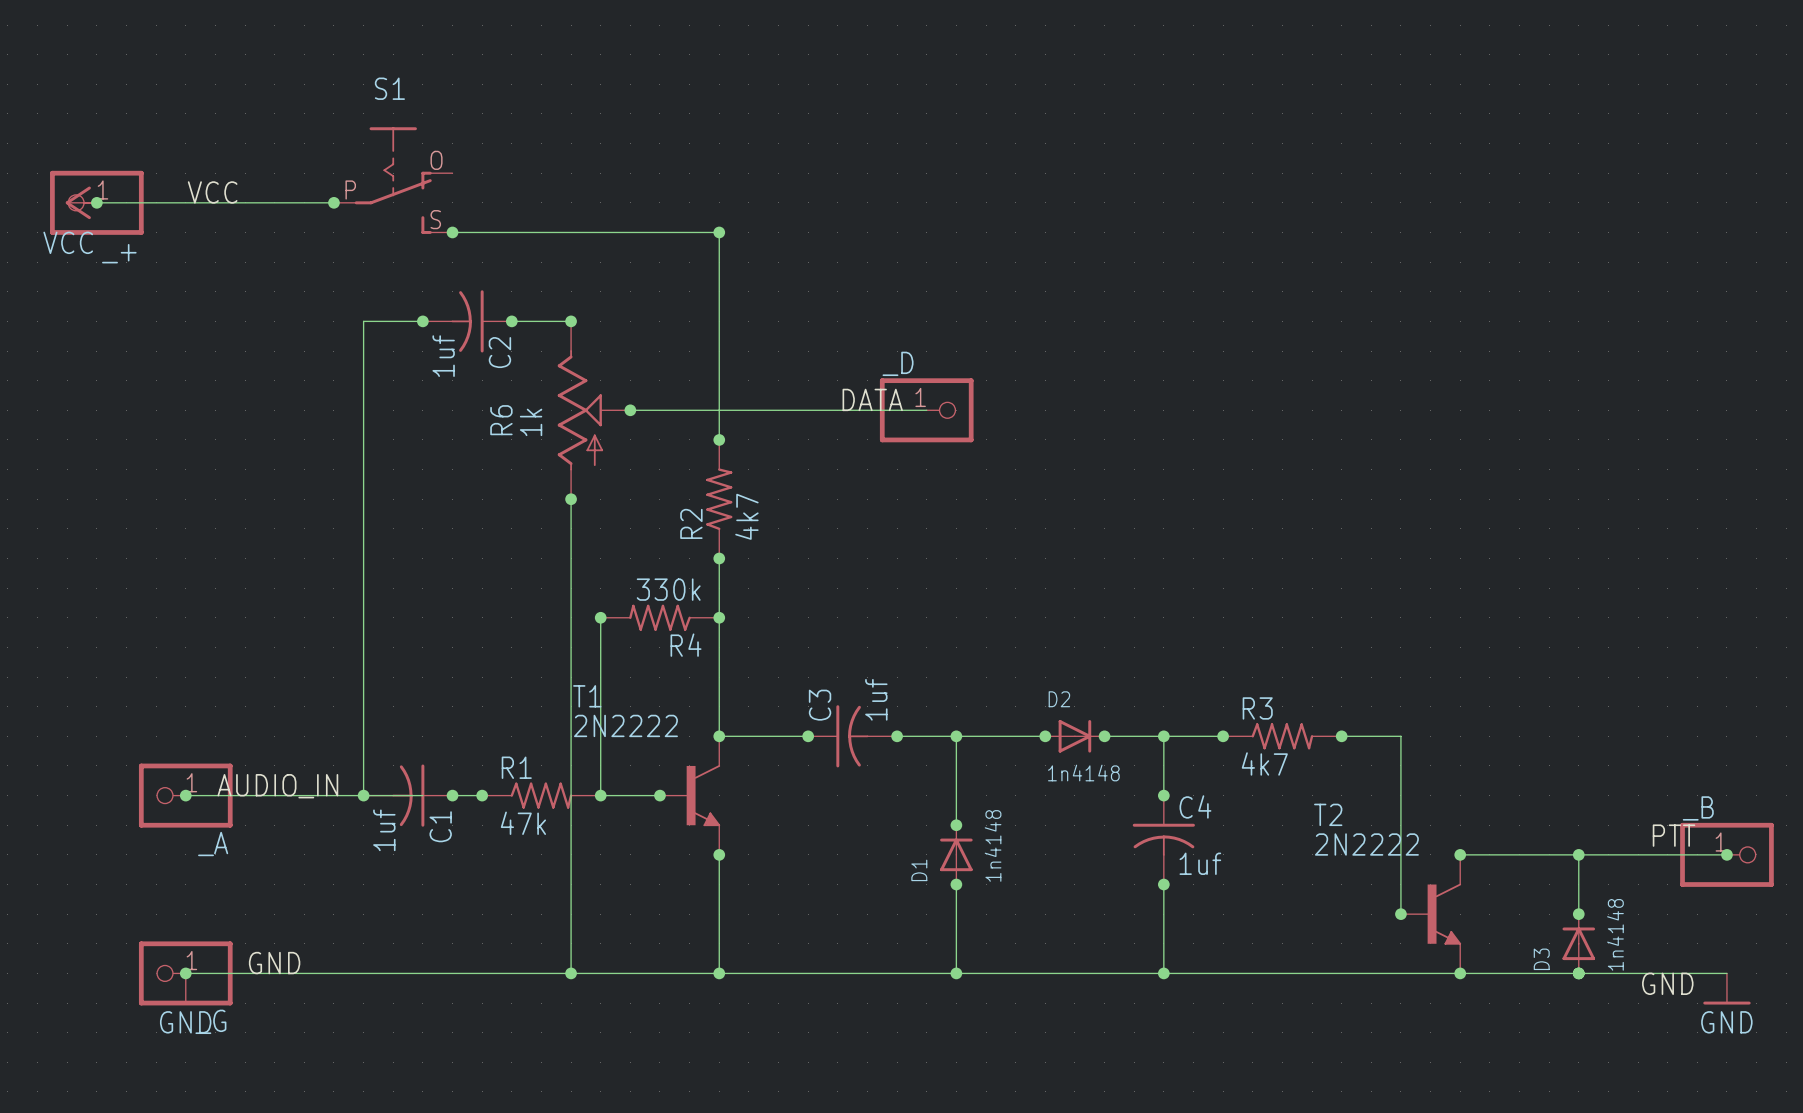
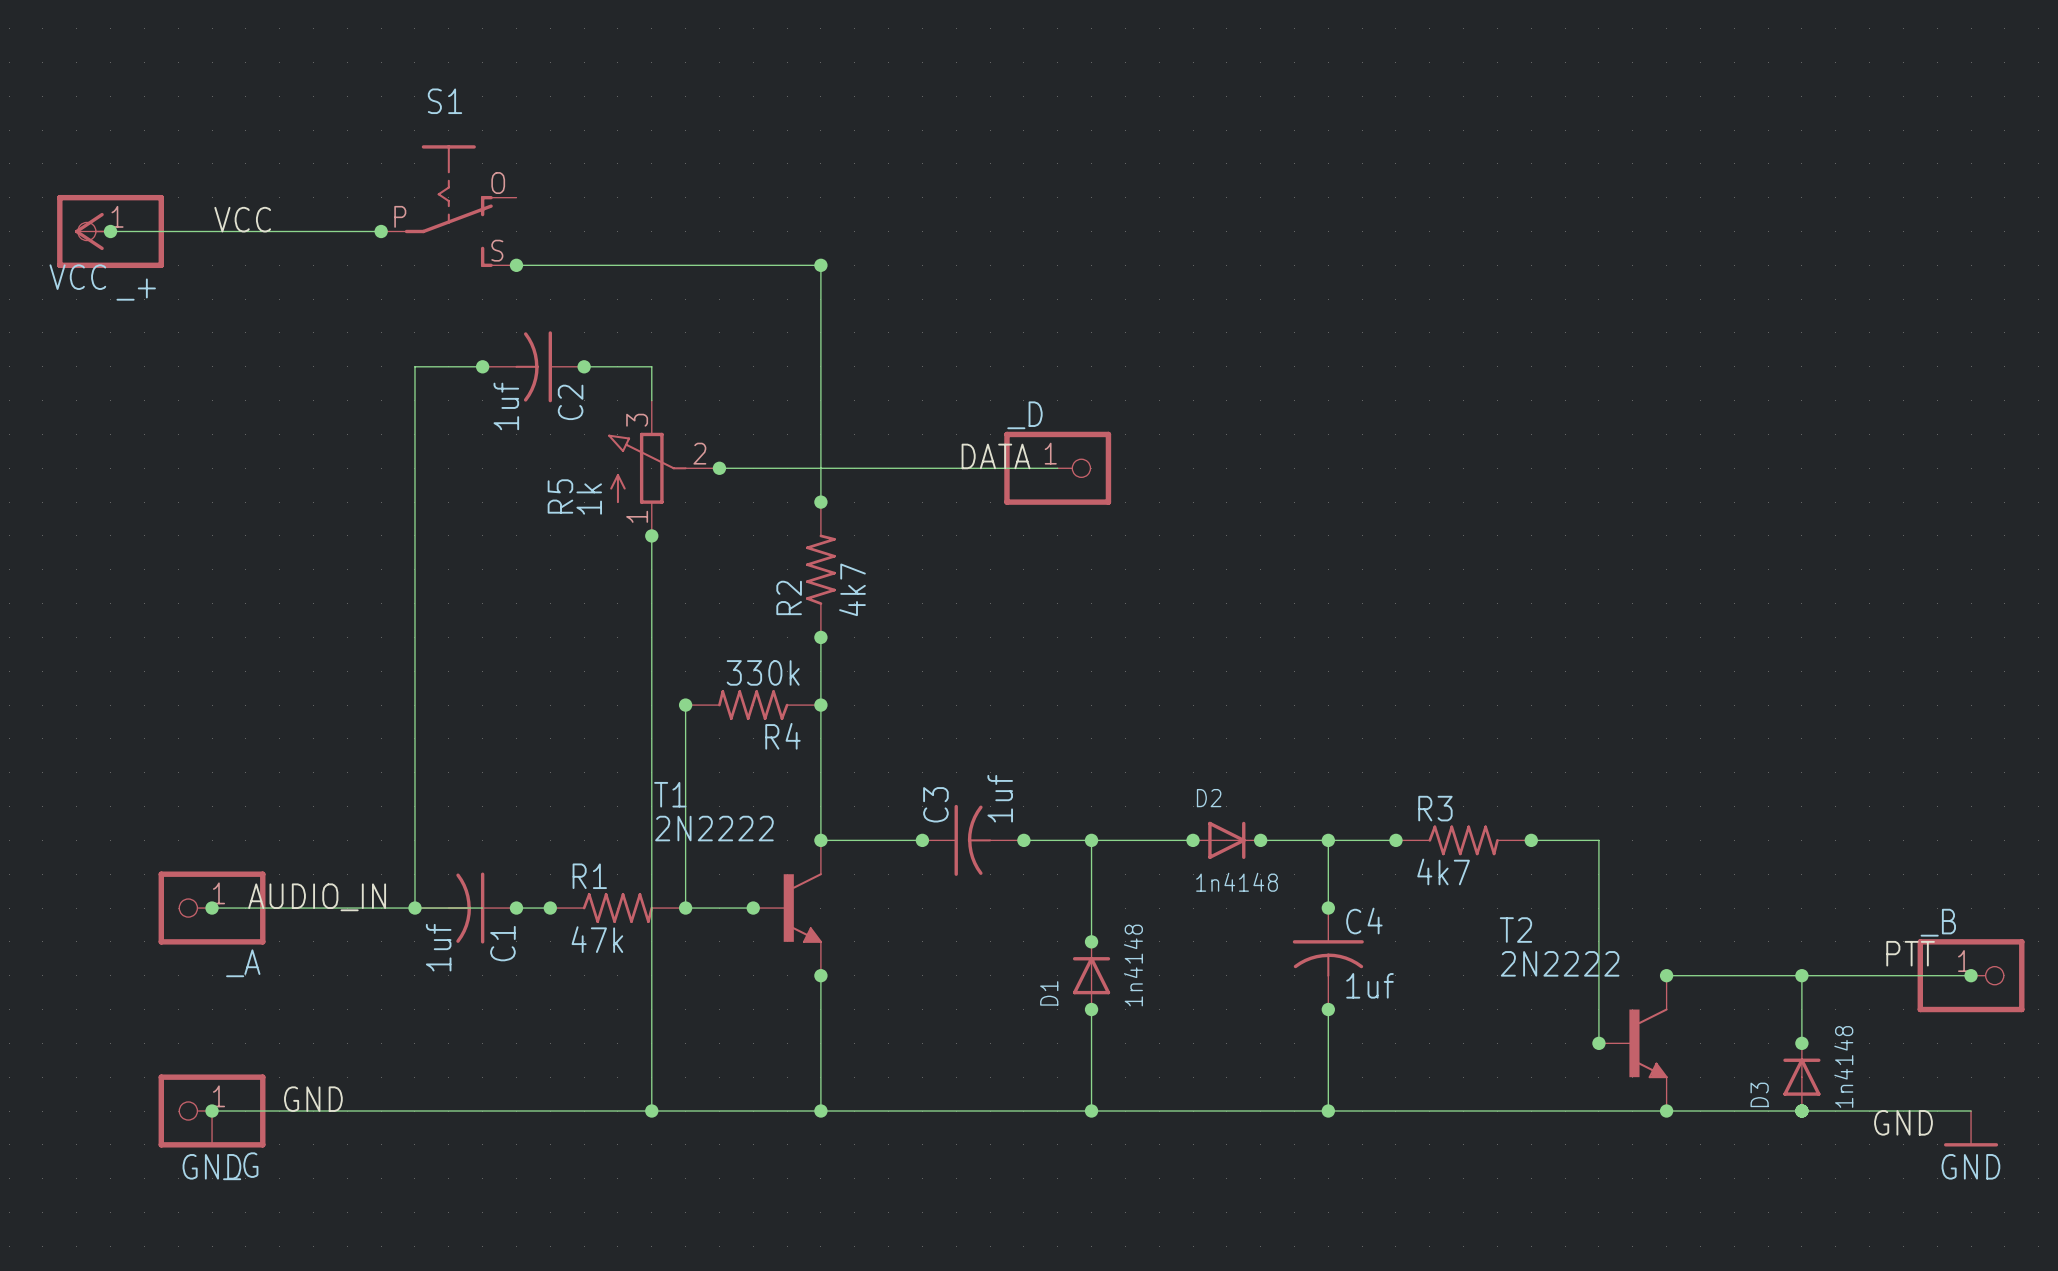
junction: (571, 321) -> none
R5: none -> 1k (663, 468)
R6: 1k (594, 410) -> none
junction position: (571, 499) -> (651, 535)

